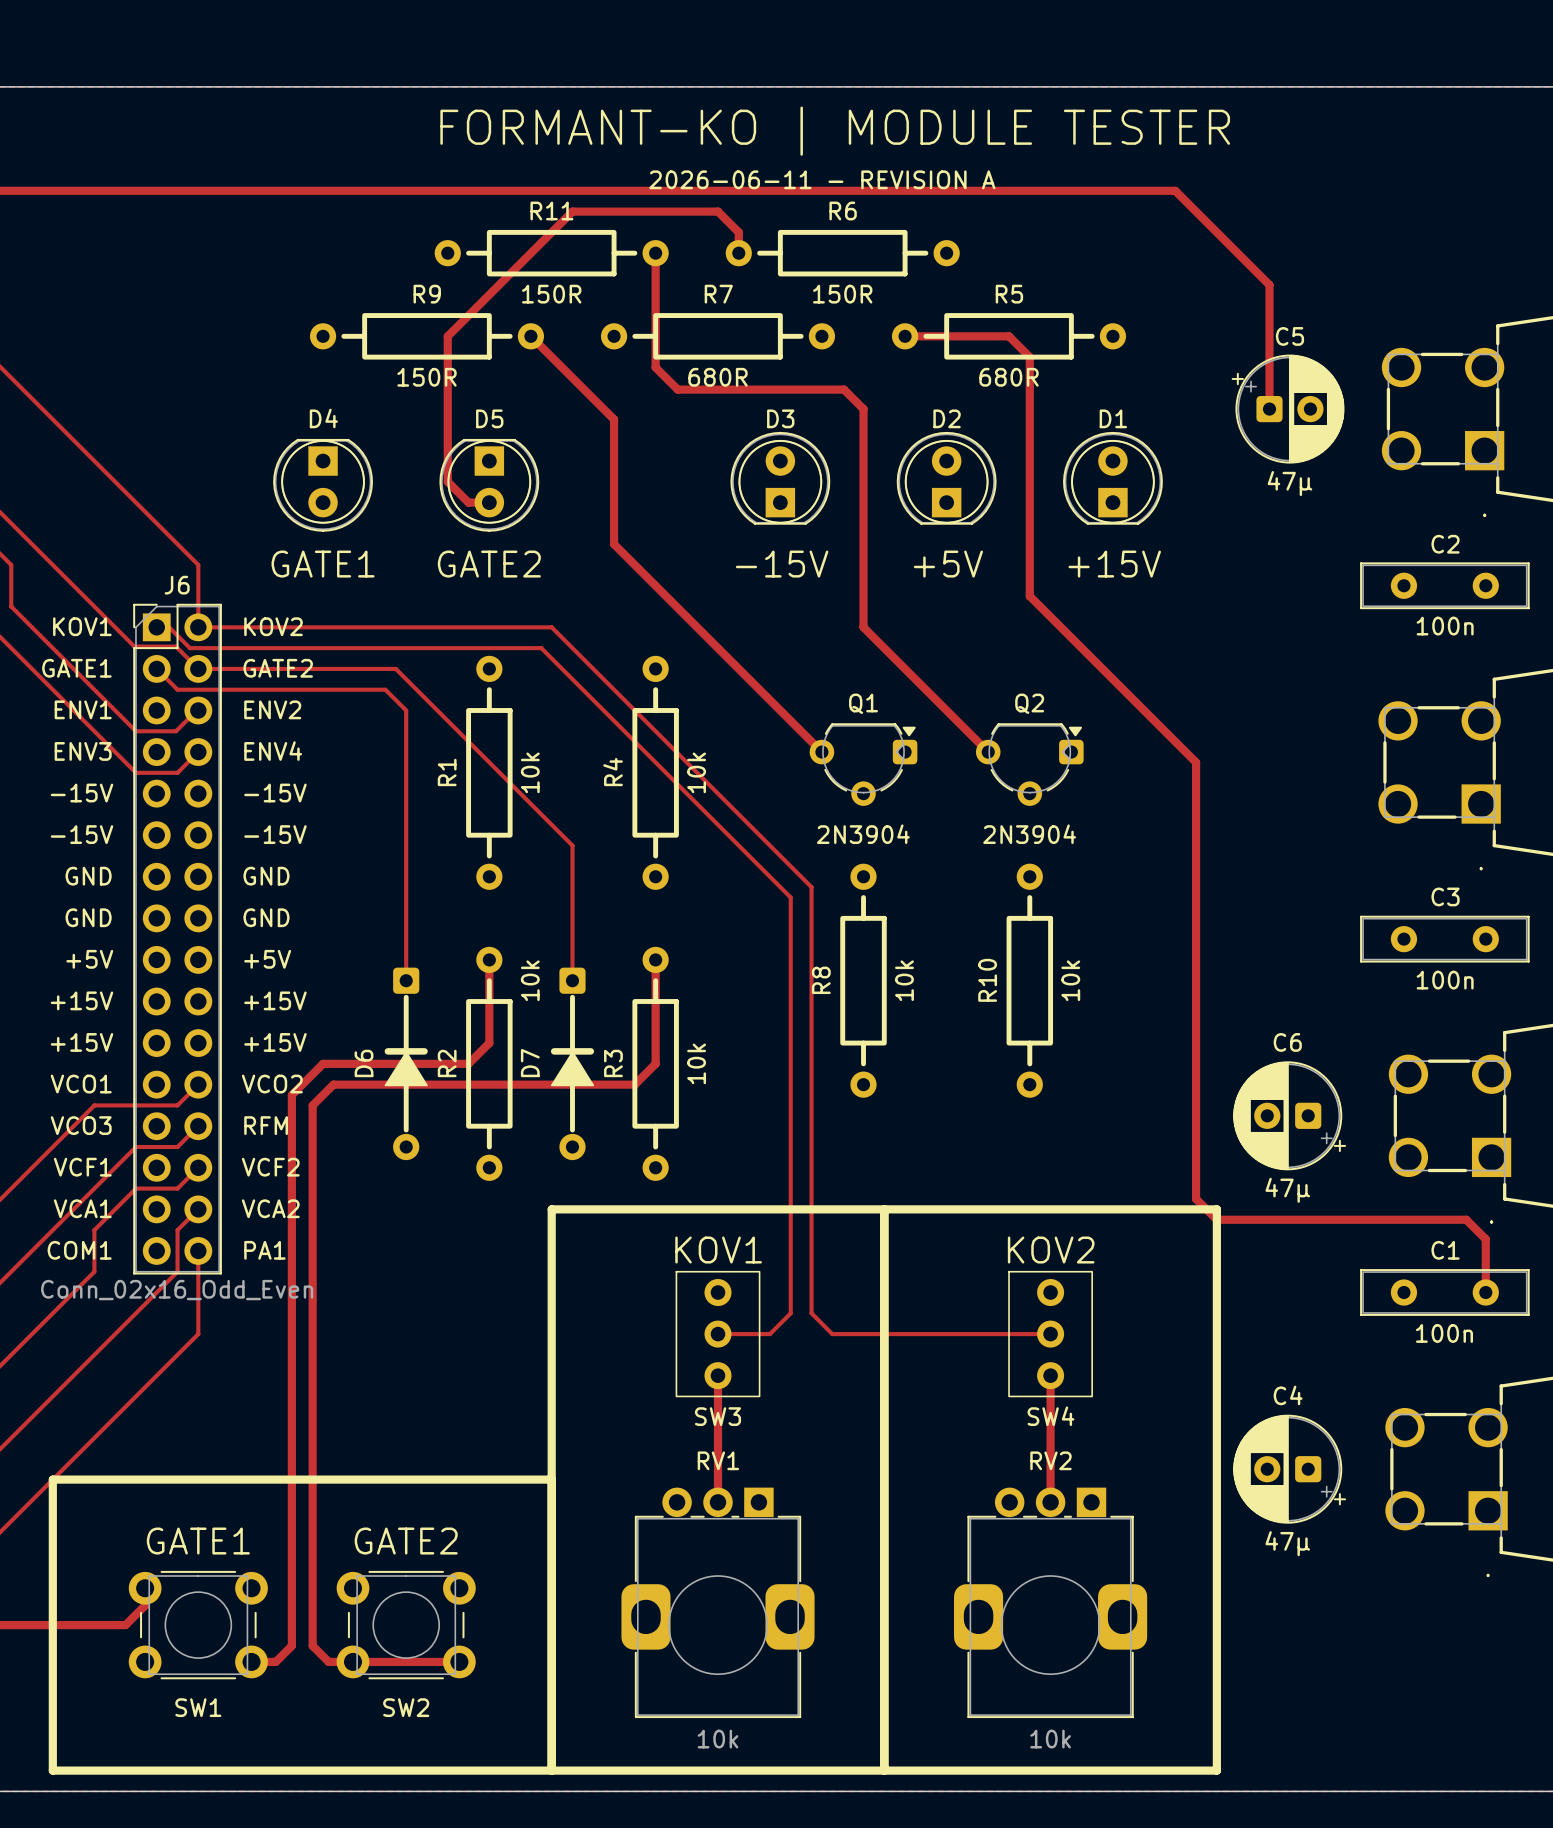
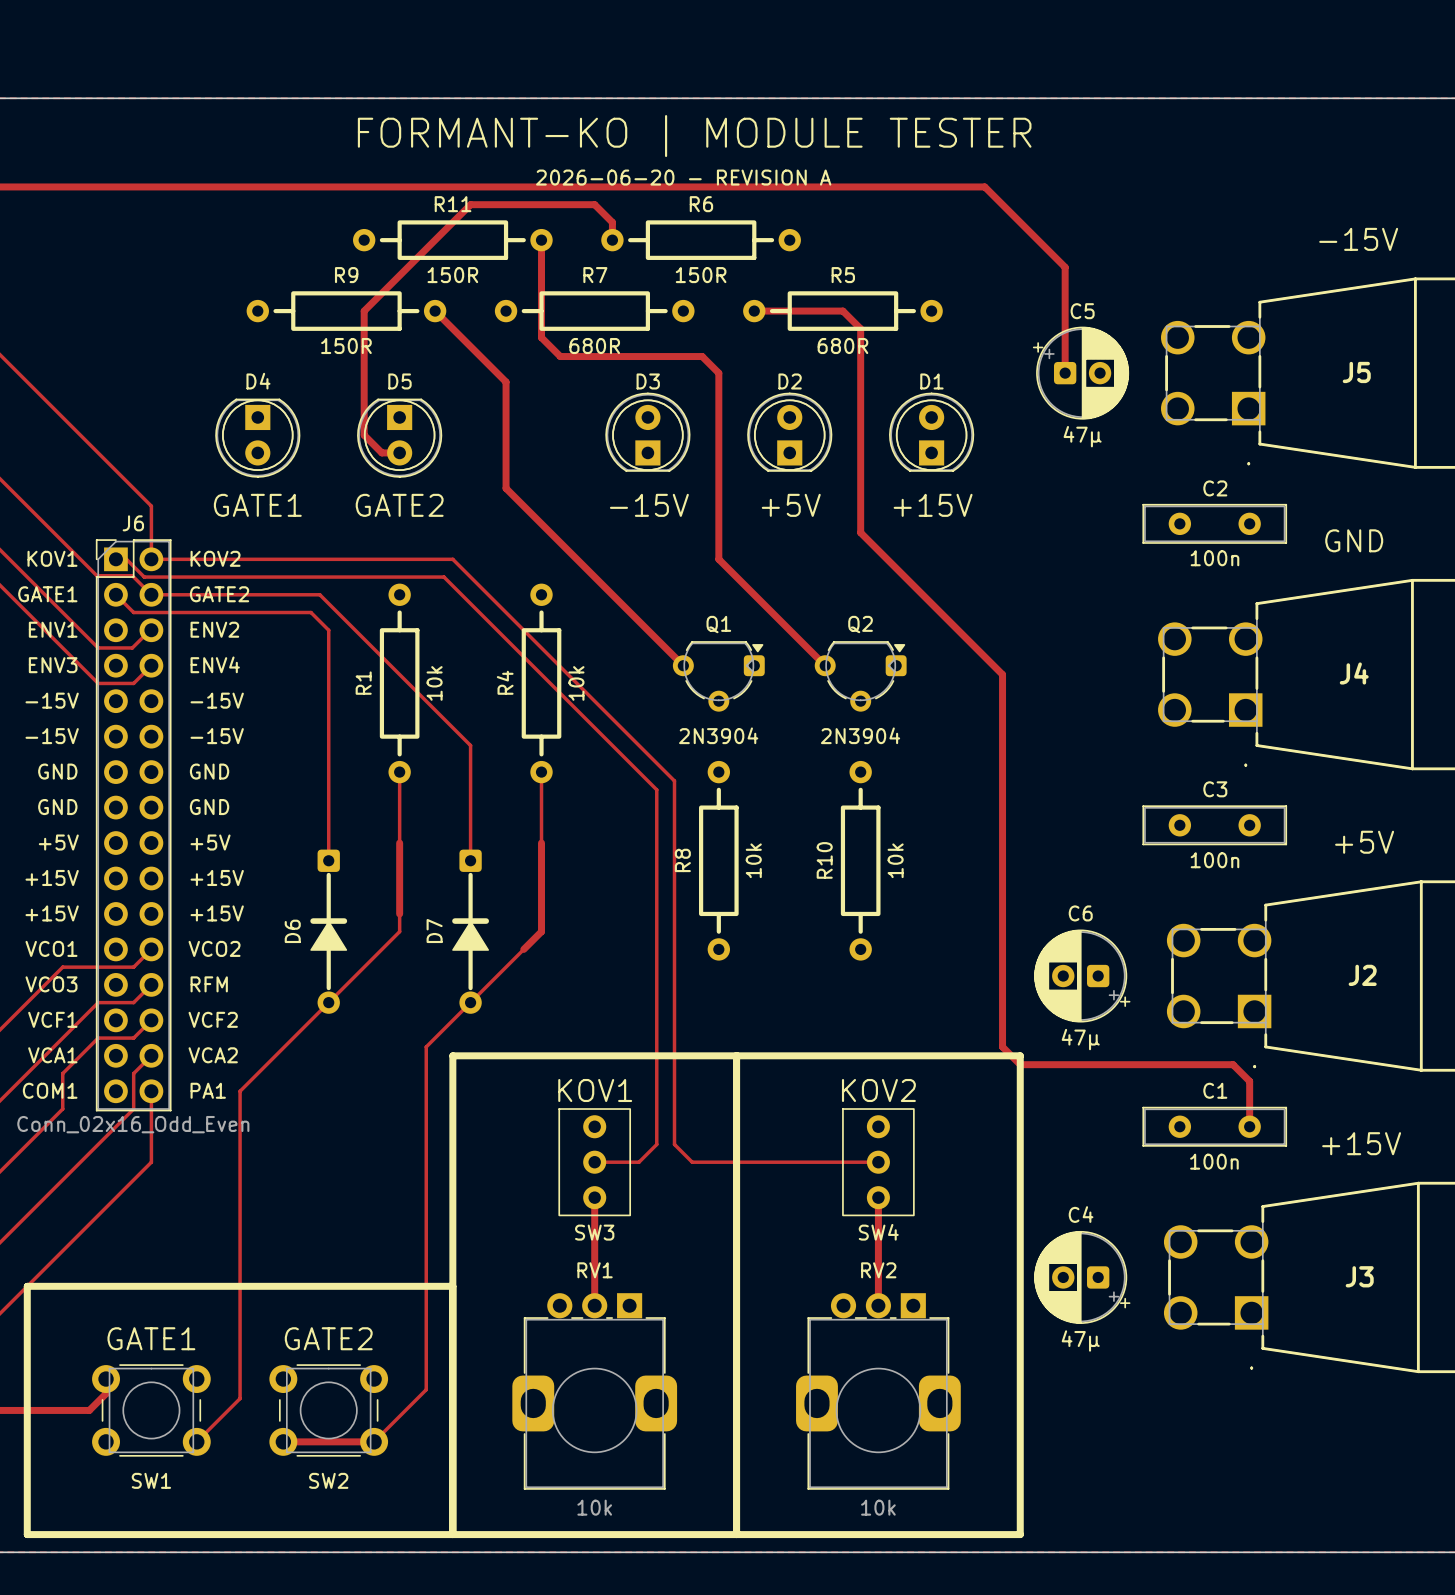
text: 2026-06-11 - REVISION A (822, 179) -> 2026-06-20 - REVISION A (683, 177)
track: none -> (399, 772) (399, 843)
track: none -> (541, 772) (541, 843)
track: (489, 1043) (468, 1063) (323, 1063) (291, 1095) (291, 1645) (275, 1661) (251, 1661) -> (399, 913) (399, 931) (240, 1091) (240, 1398) (196, 1441)
R2: 10k (489, 1063) -> none
R3: 10k (655, 1063) -> none
track: (634, 1084) (333, 1084) (312, 1105) (312, 1645) (328, 1661) (353, 1661) -> (523, 949) (426, 1046) (426, 1389) (374, 1441)

